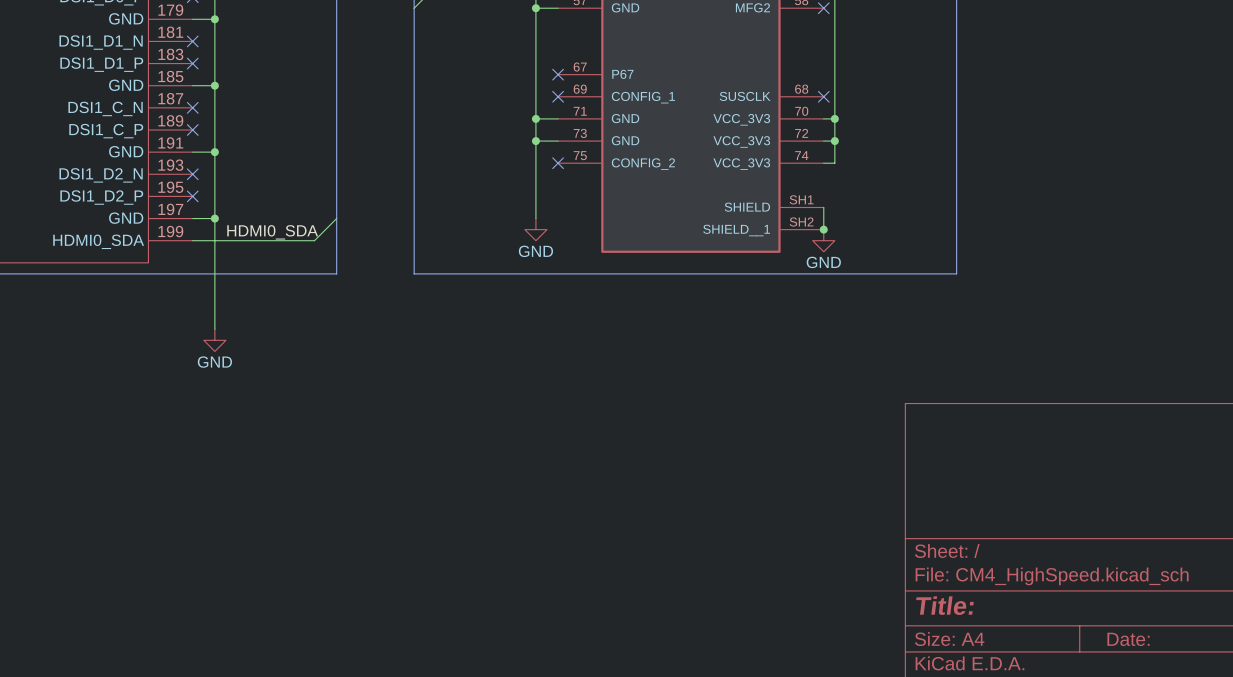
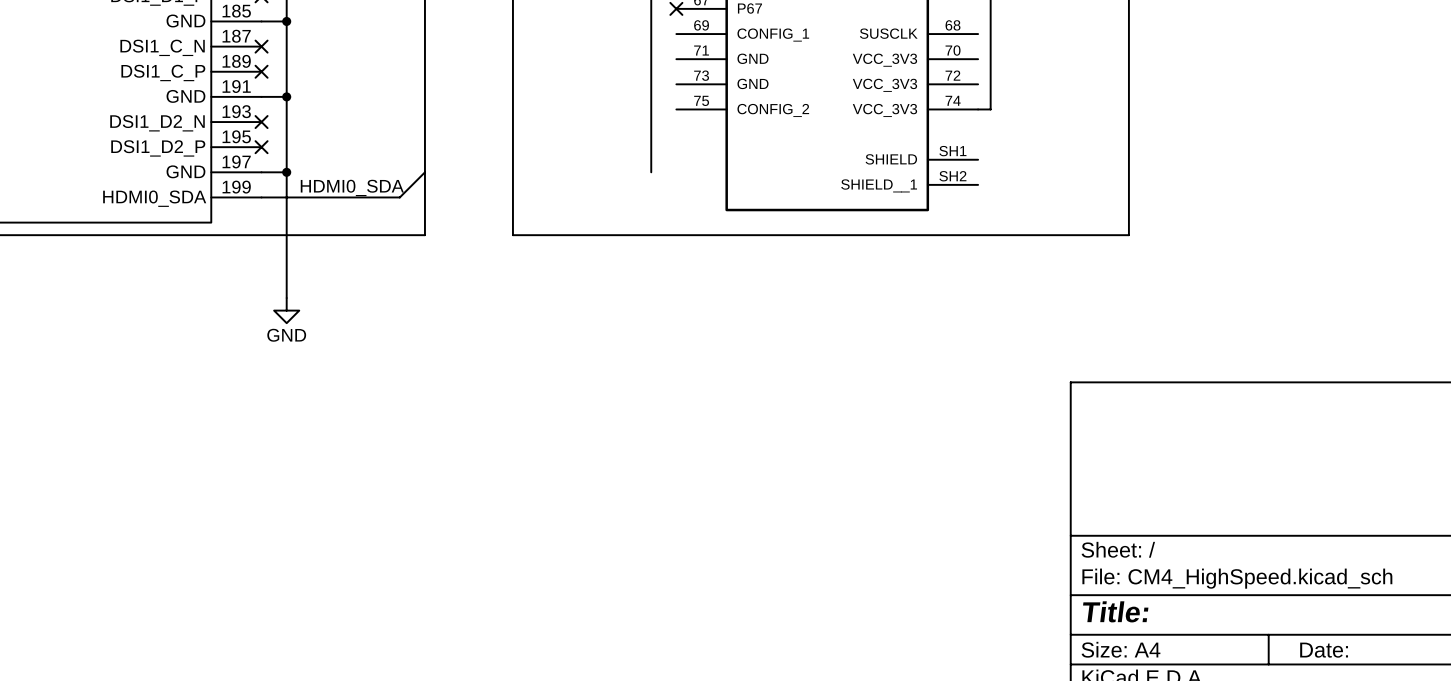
no-connect mark: (558, 96) -> none
no-connect mark: (823, 96) -> none
wire: (535, 118) (558, 118) -> none
junction: (535, 118) -> none
wire: (823, 118) (834, 118) -> none
junction: (834, 118) -> none
wire: (535, 141) (558, 141) -> none
junction: (535, 141) -> none
wire: (823, 141) (834, 141) -> none
junction: (834, 141) -> none
no-connect mark: (558, 163) -> none
wire: (823, 207) (823, 229) -> none
power symbol: GND (535, 229) -> none
junction: (823, 229) -> none
power symbol: GND (823, 240) -> none

